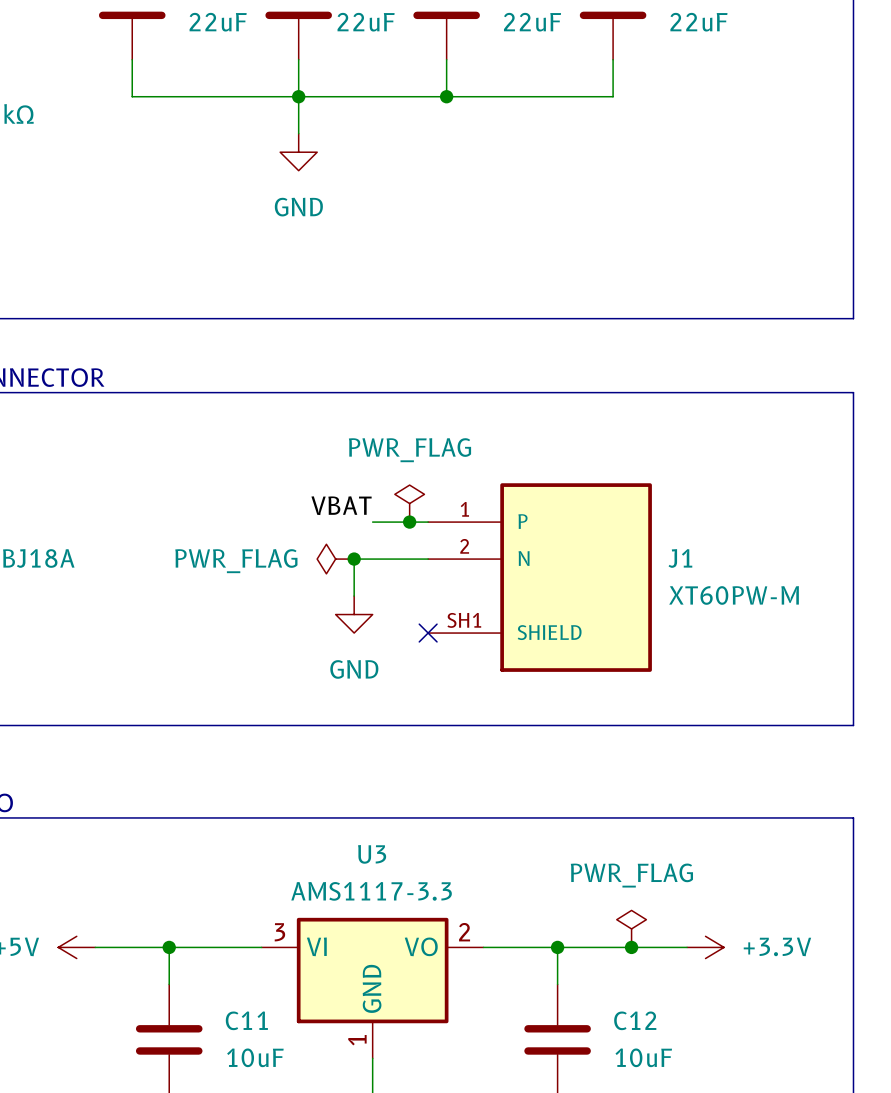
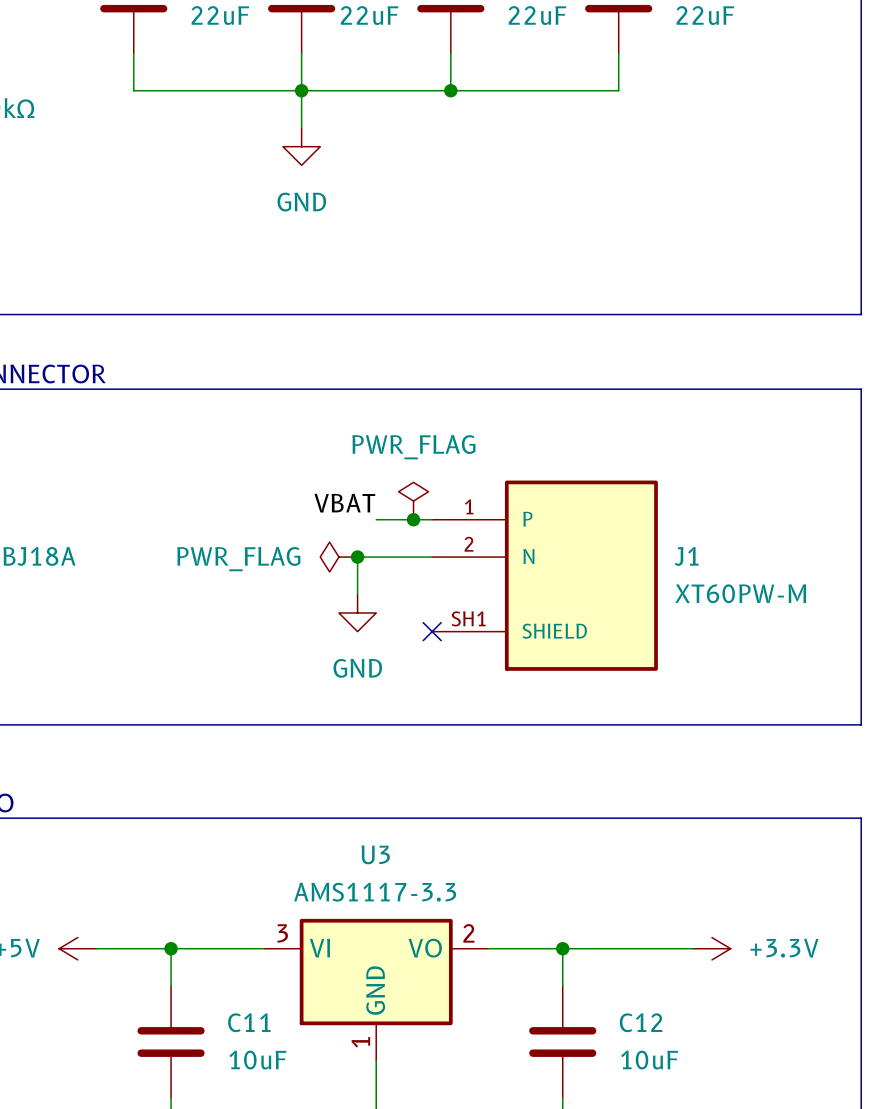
power symbol: PWR_FLAG (631, 928) -> none
junction: (631, 947) -> none

